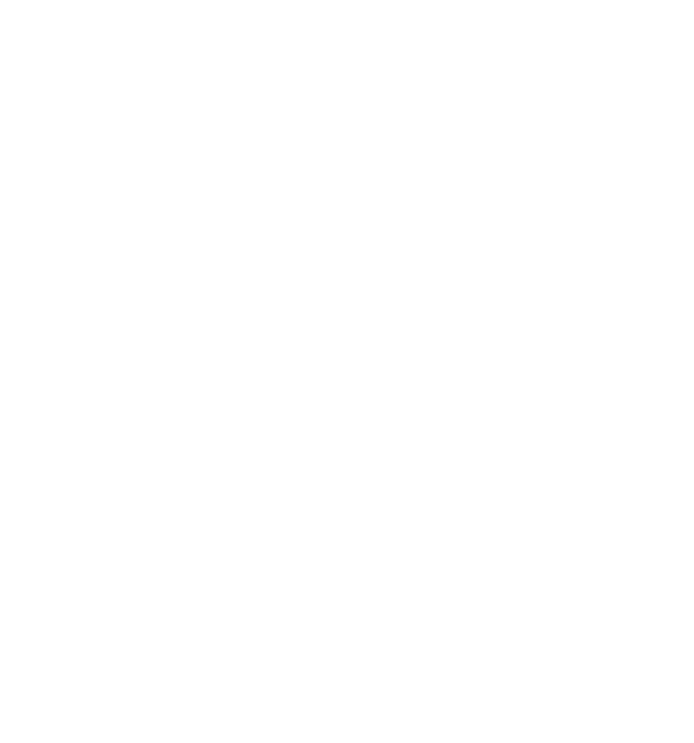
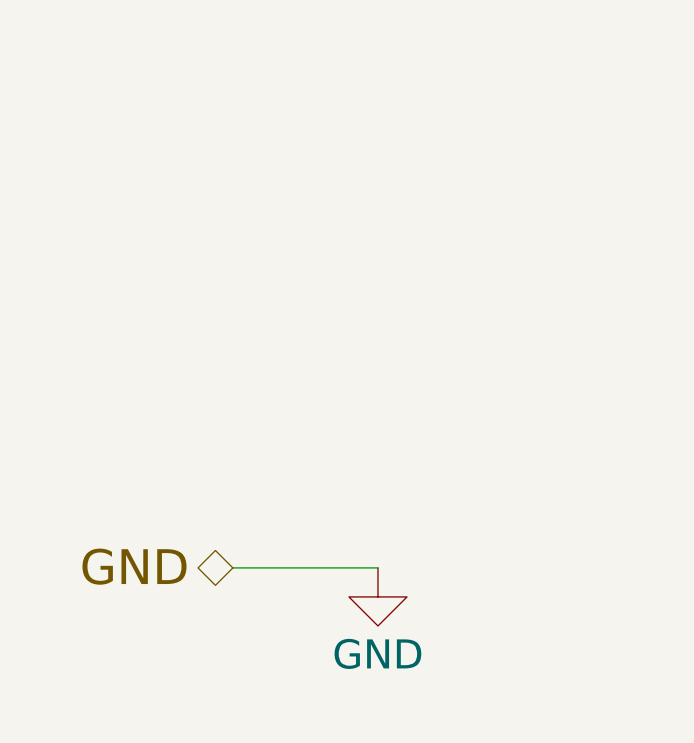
hierarchical label: none -> GND (134, 566)
wire: none -> (232, 567) (377, 567)
power symbol: none -> GND (377, 596)

